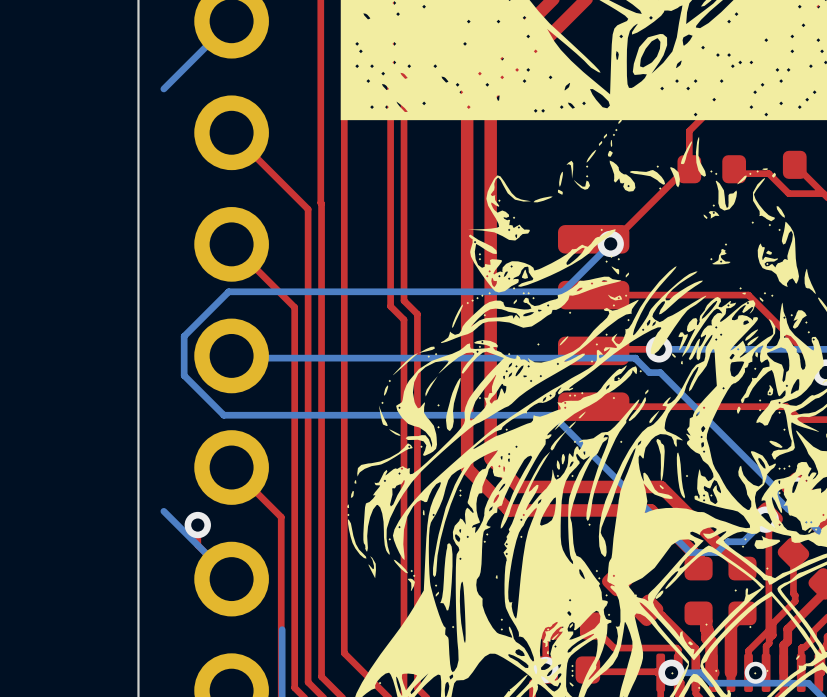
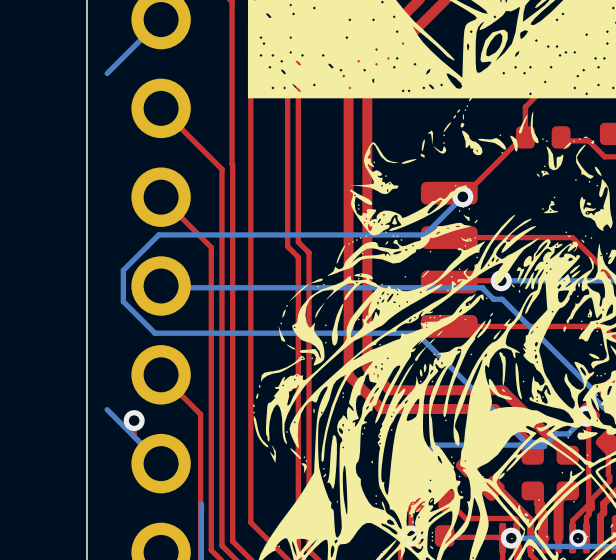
bottom track: none -> (544, 446) (434, 445) (420, 459)

